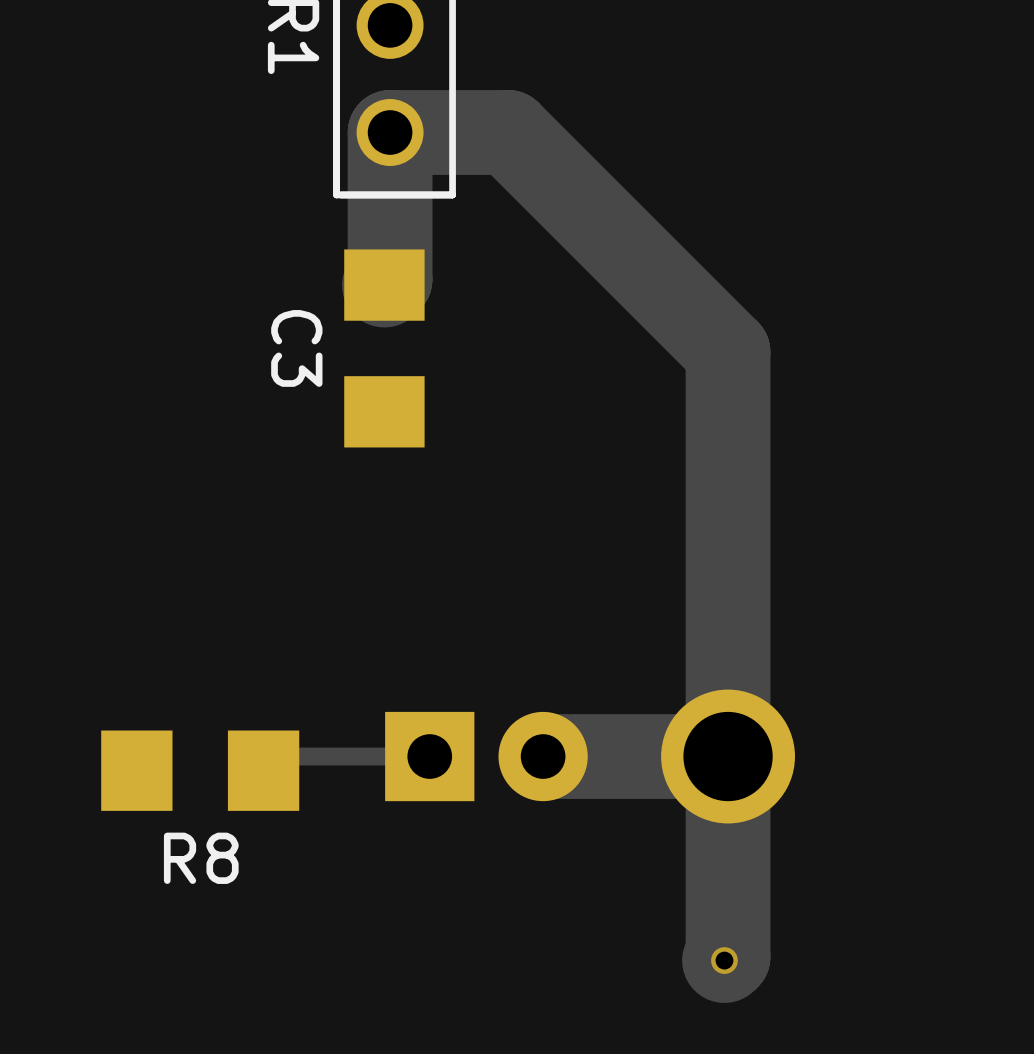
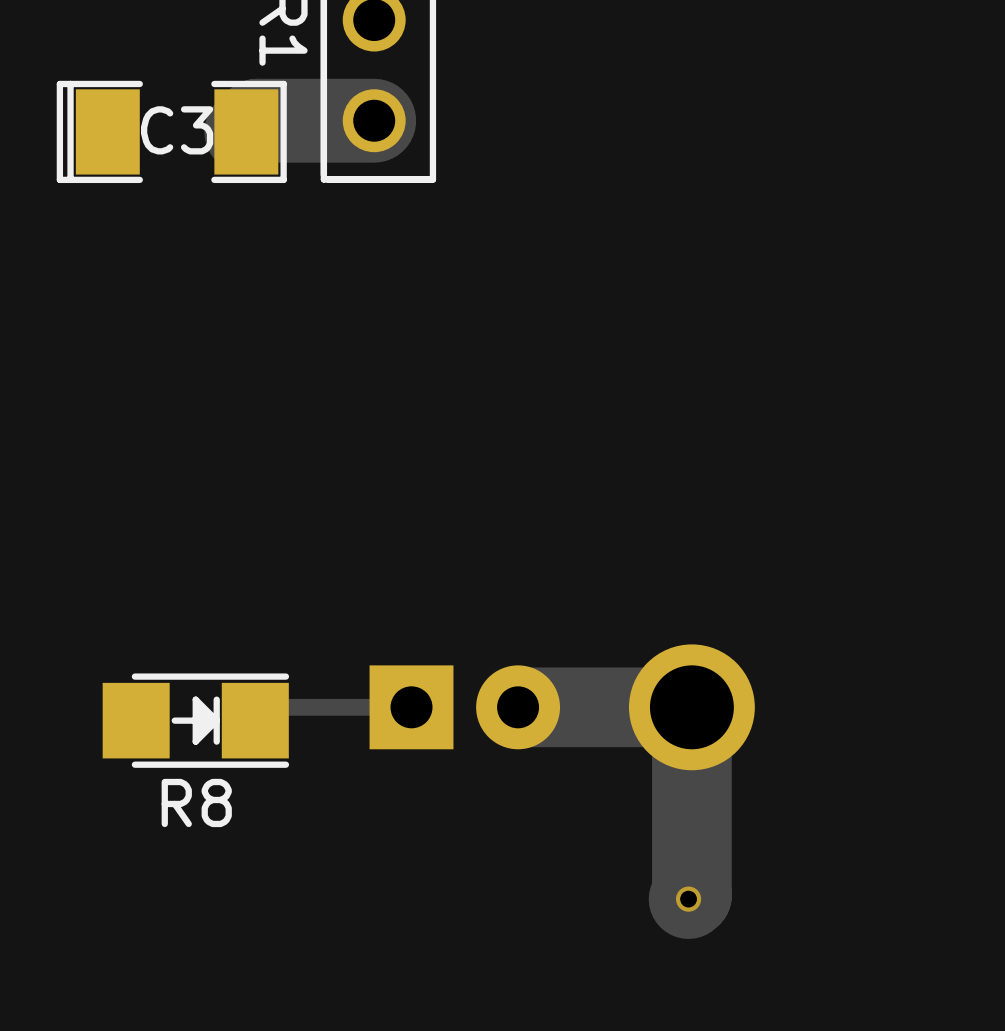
track: none -> (374, 120) (257, 120) (246, 131)
C3 footprint: [344, 249, 425, 448] -> [56, 80, 287, 184]
track: (384, 285) (390, 279) (390, 132) (508, 132) (728, 352) (728, 756) -> none
C3 name position: C3 (296, 348) -> C3 (177, 130)
R8 footprint: [101, 730, 300, 811] -> [102, 673, 290, 768]

